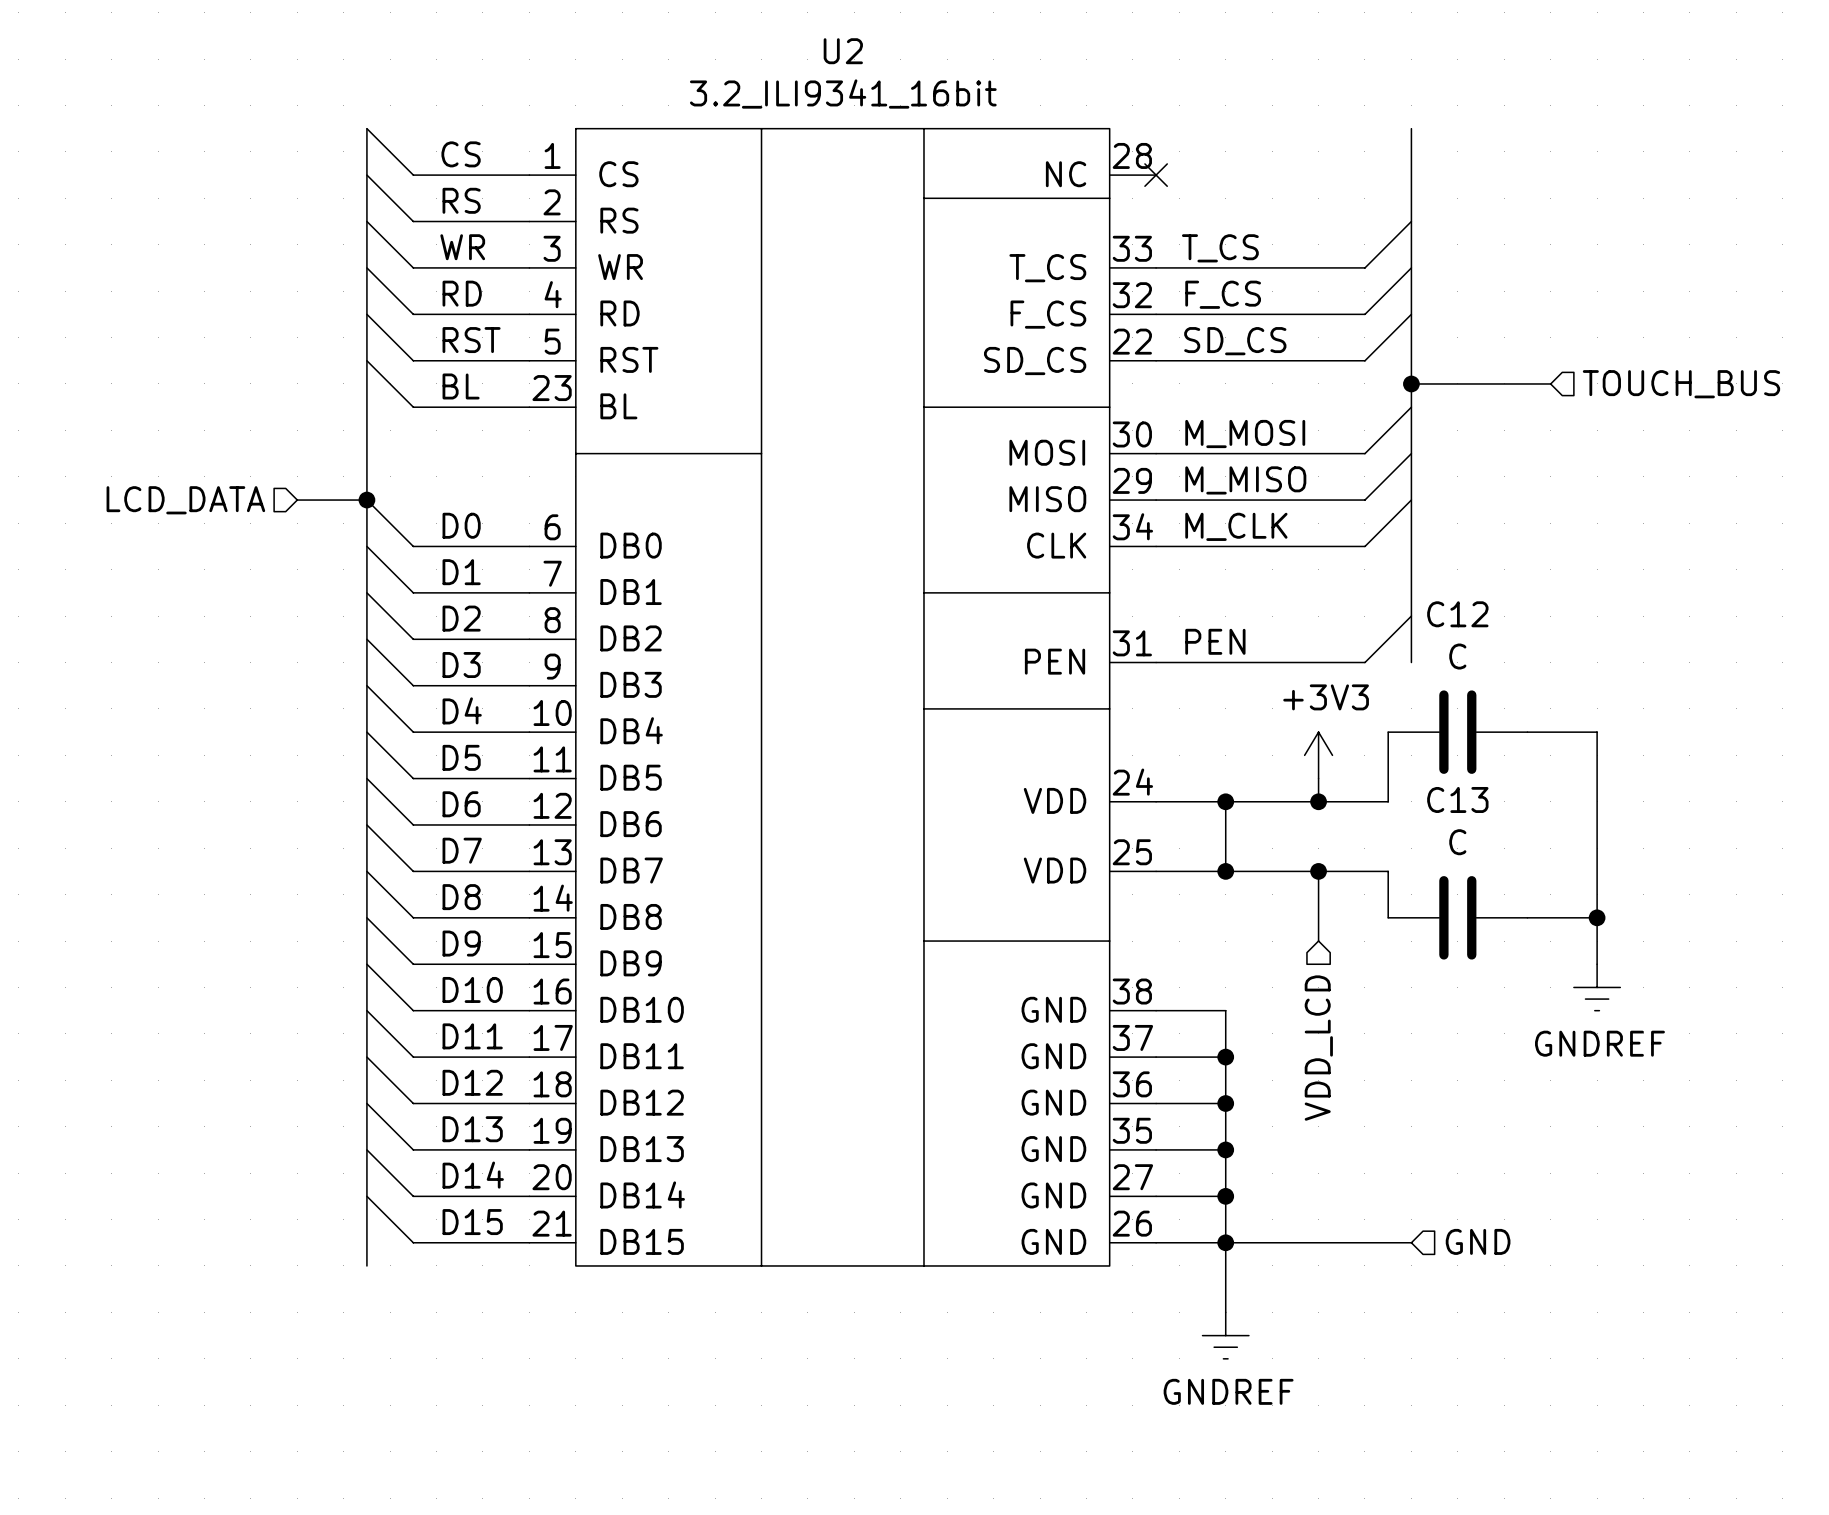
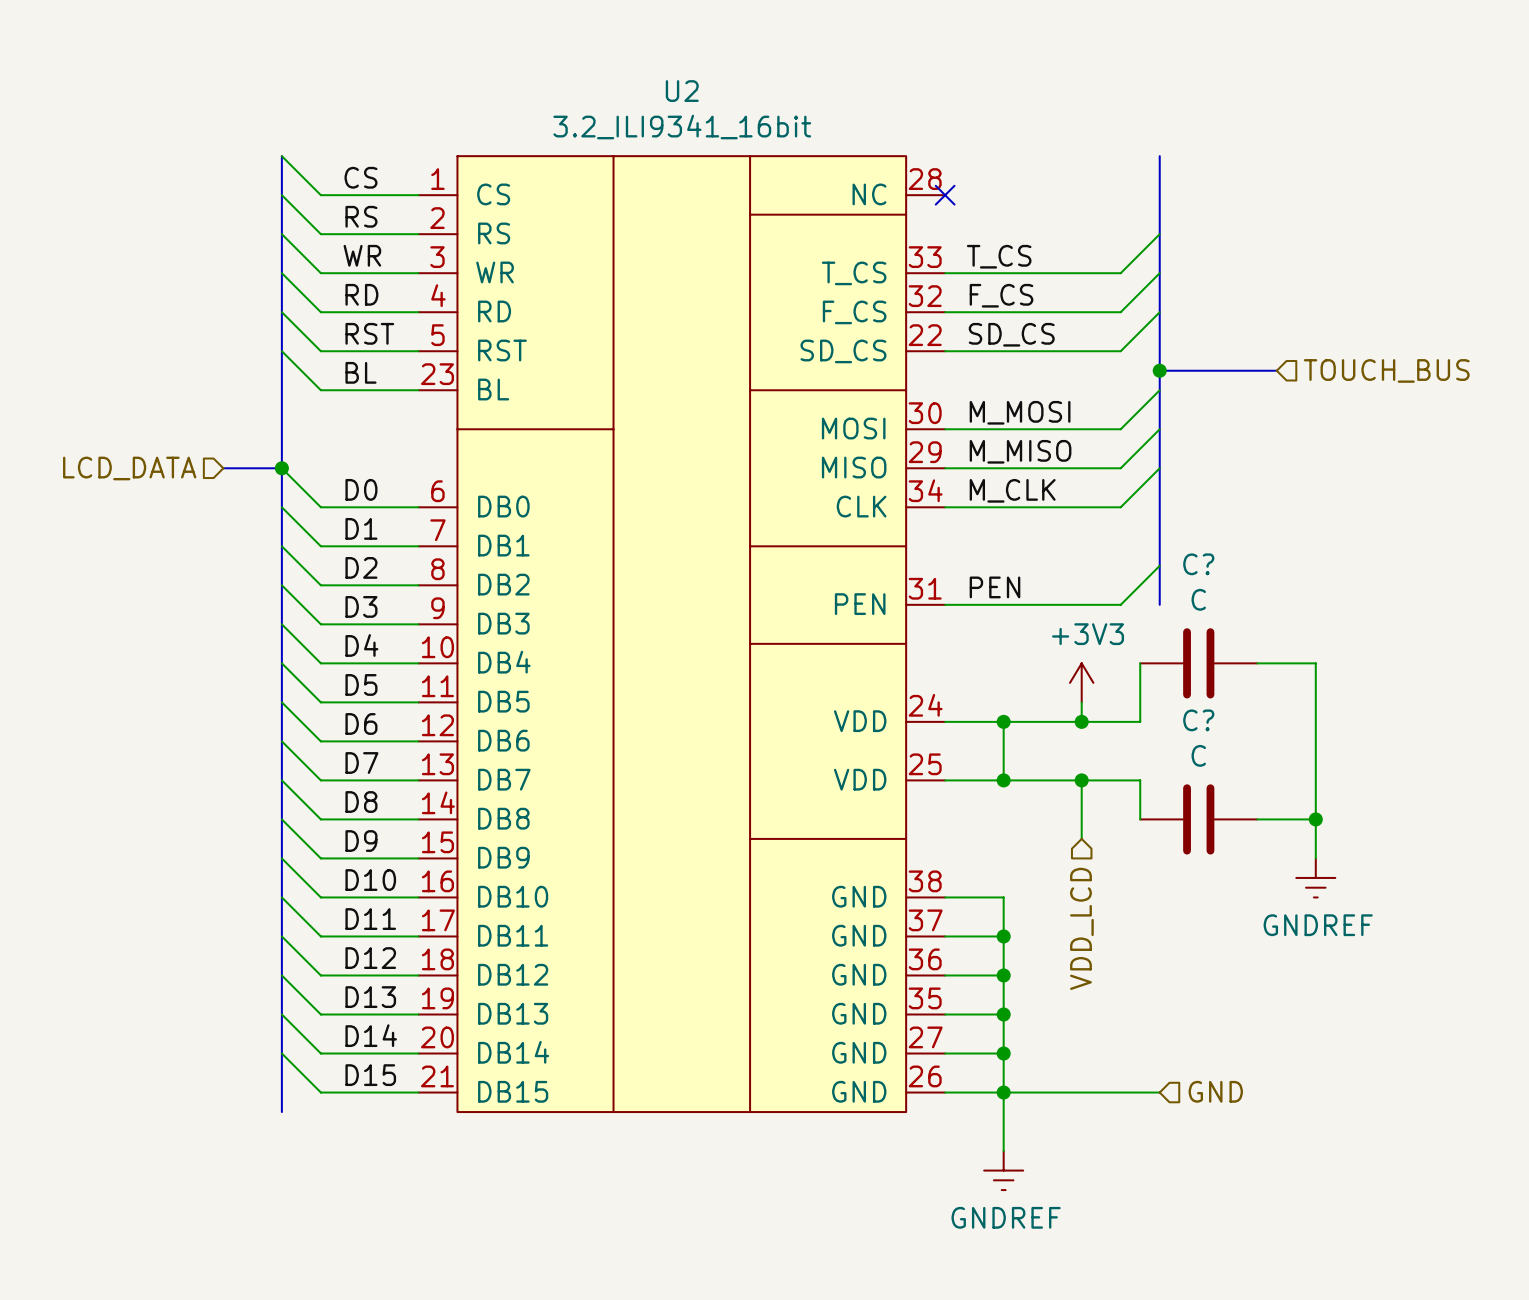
C12 name: C12 (1457, 614) -> C? (1198, 564)
C13 name: C13 (1457, 799) -> C? (1198, 720)

